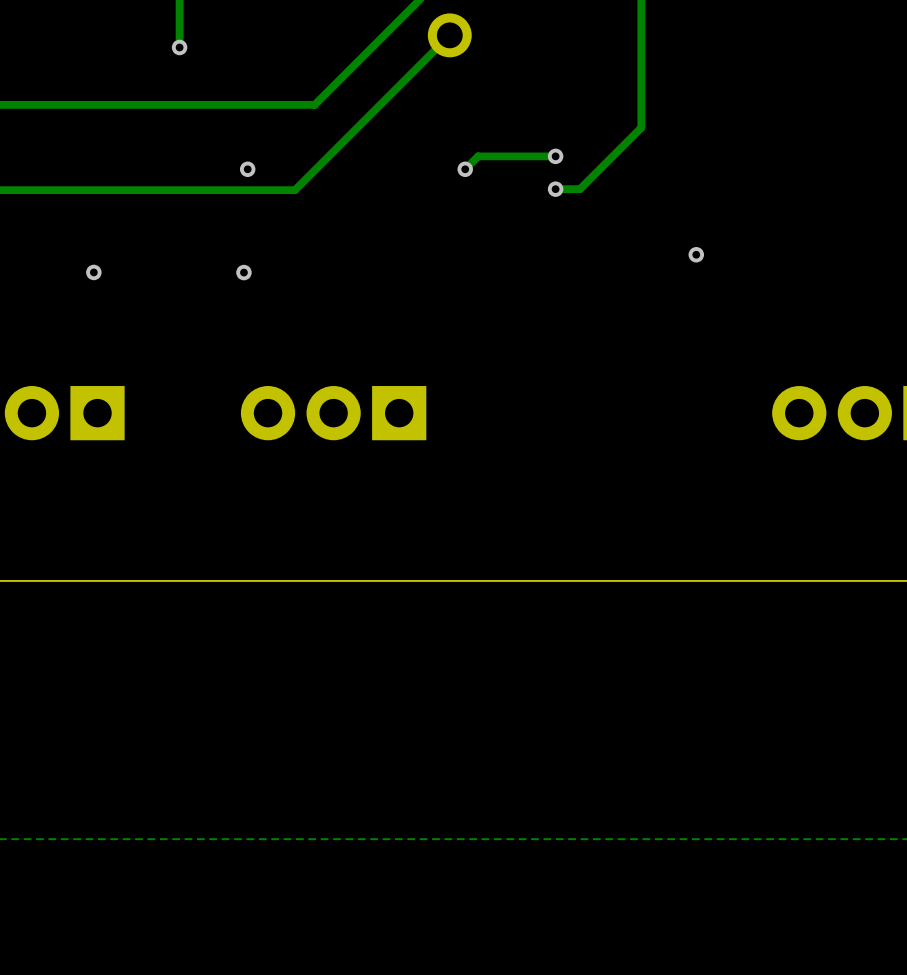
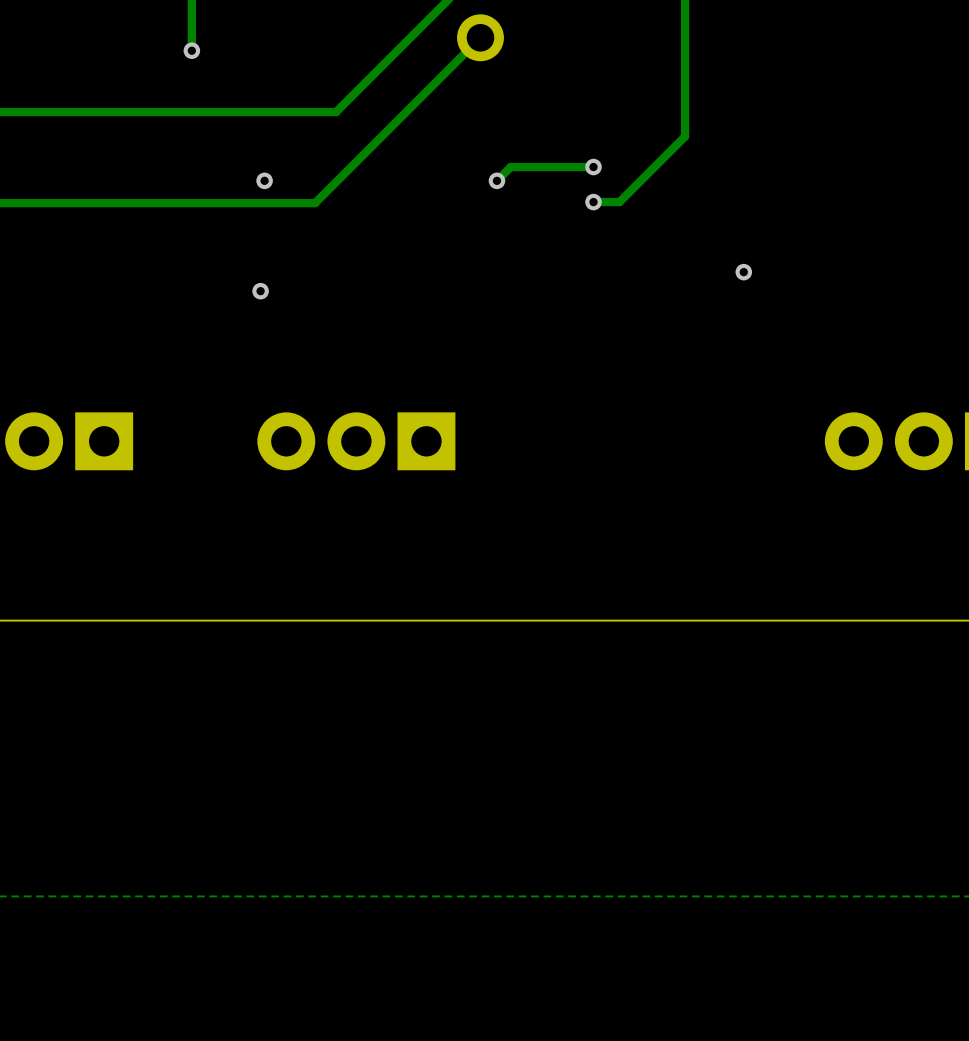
via: (93, 272) -> none

